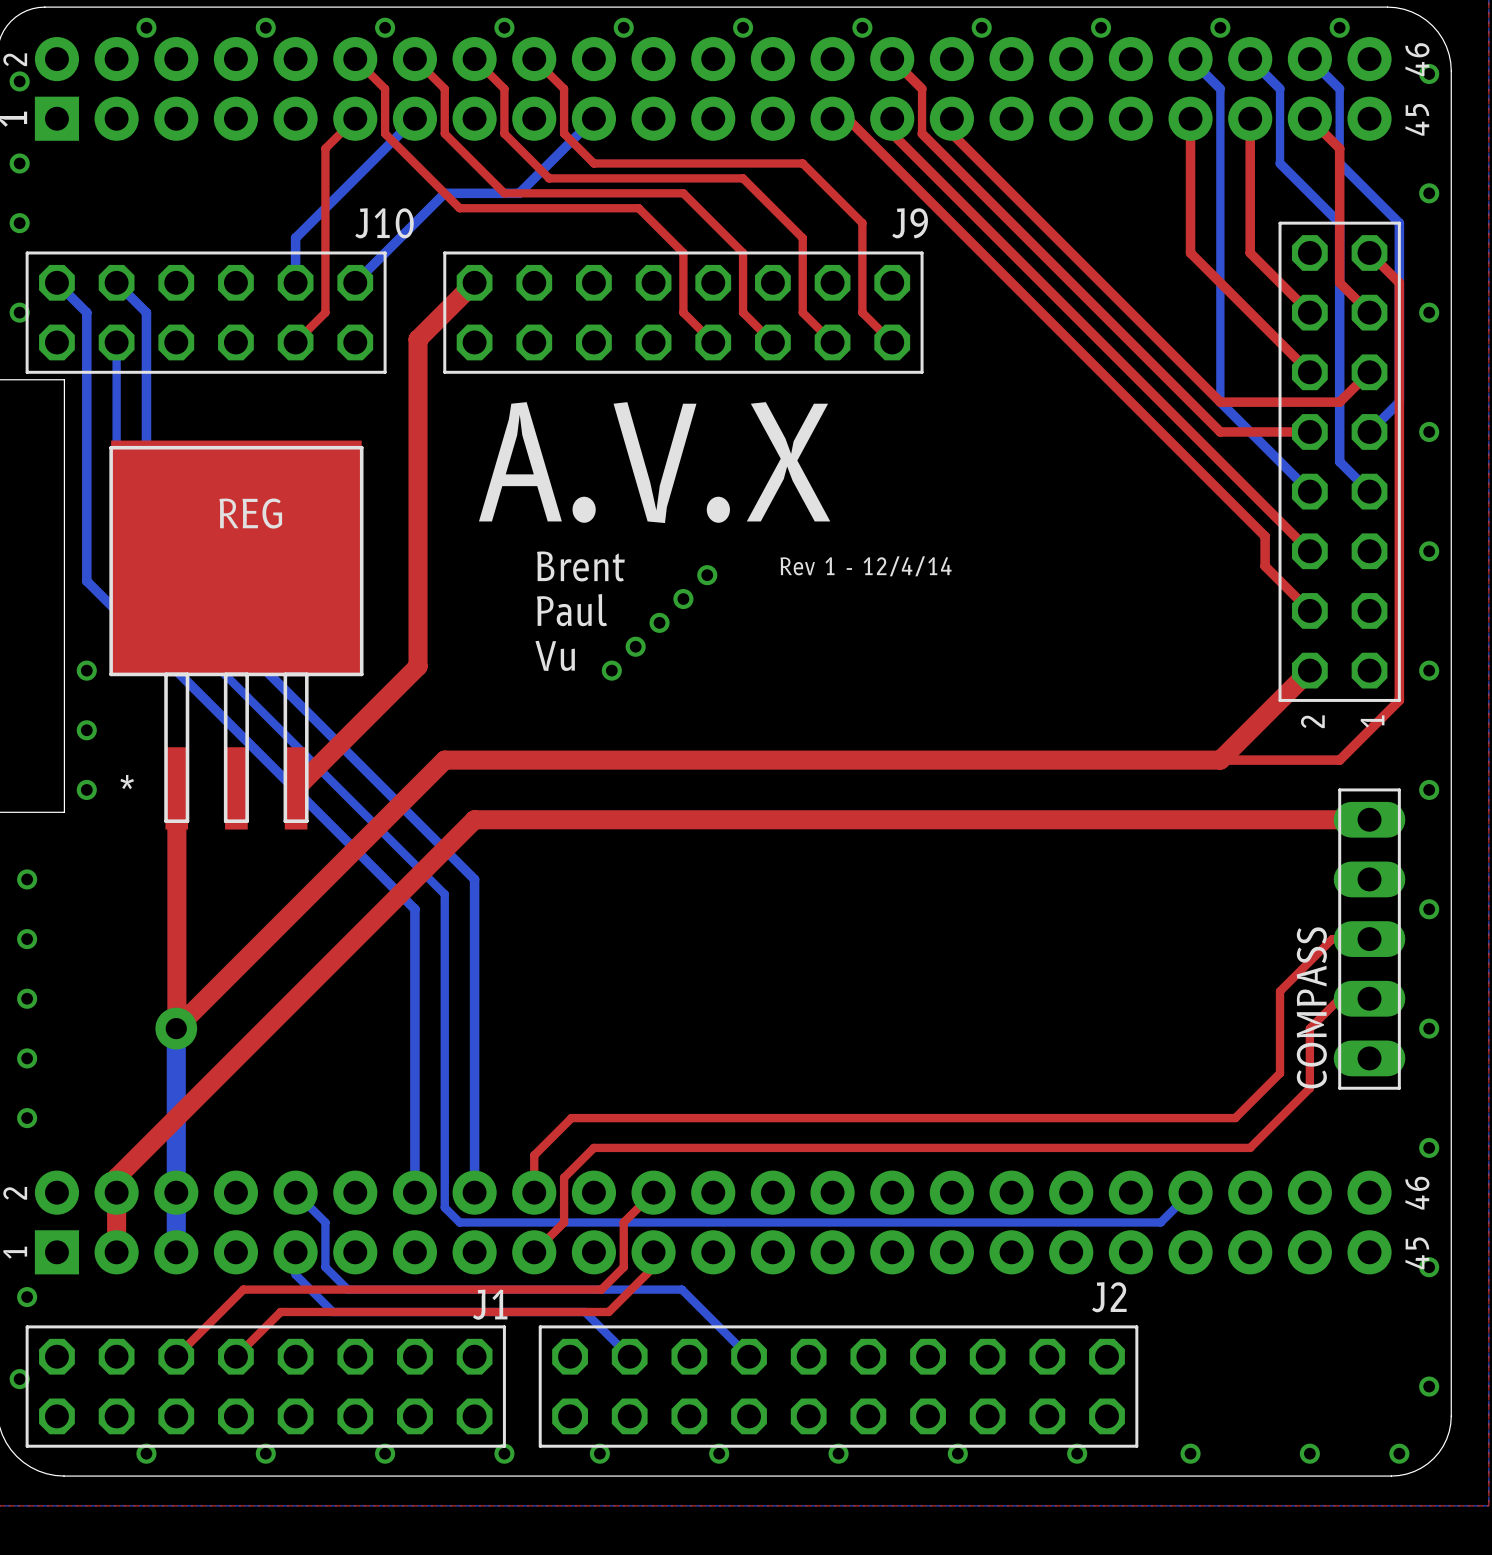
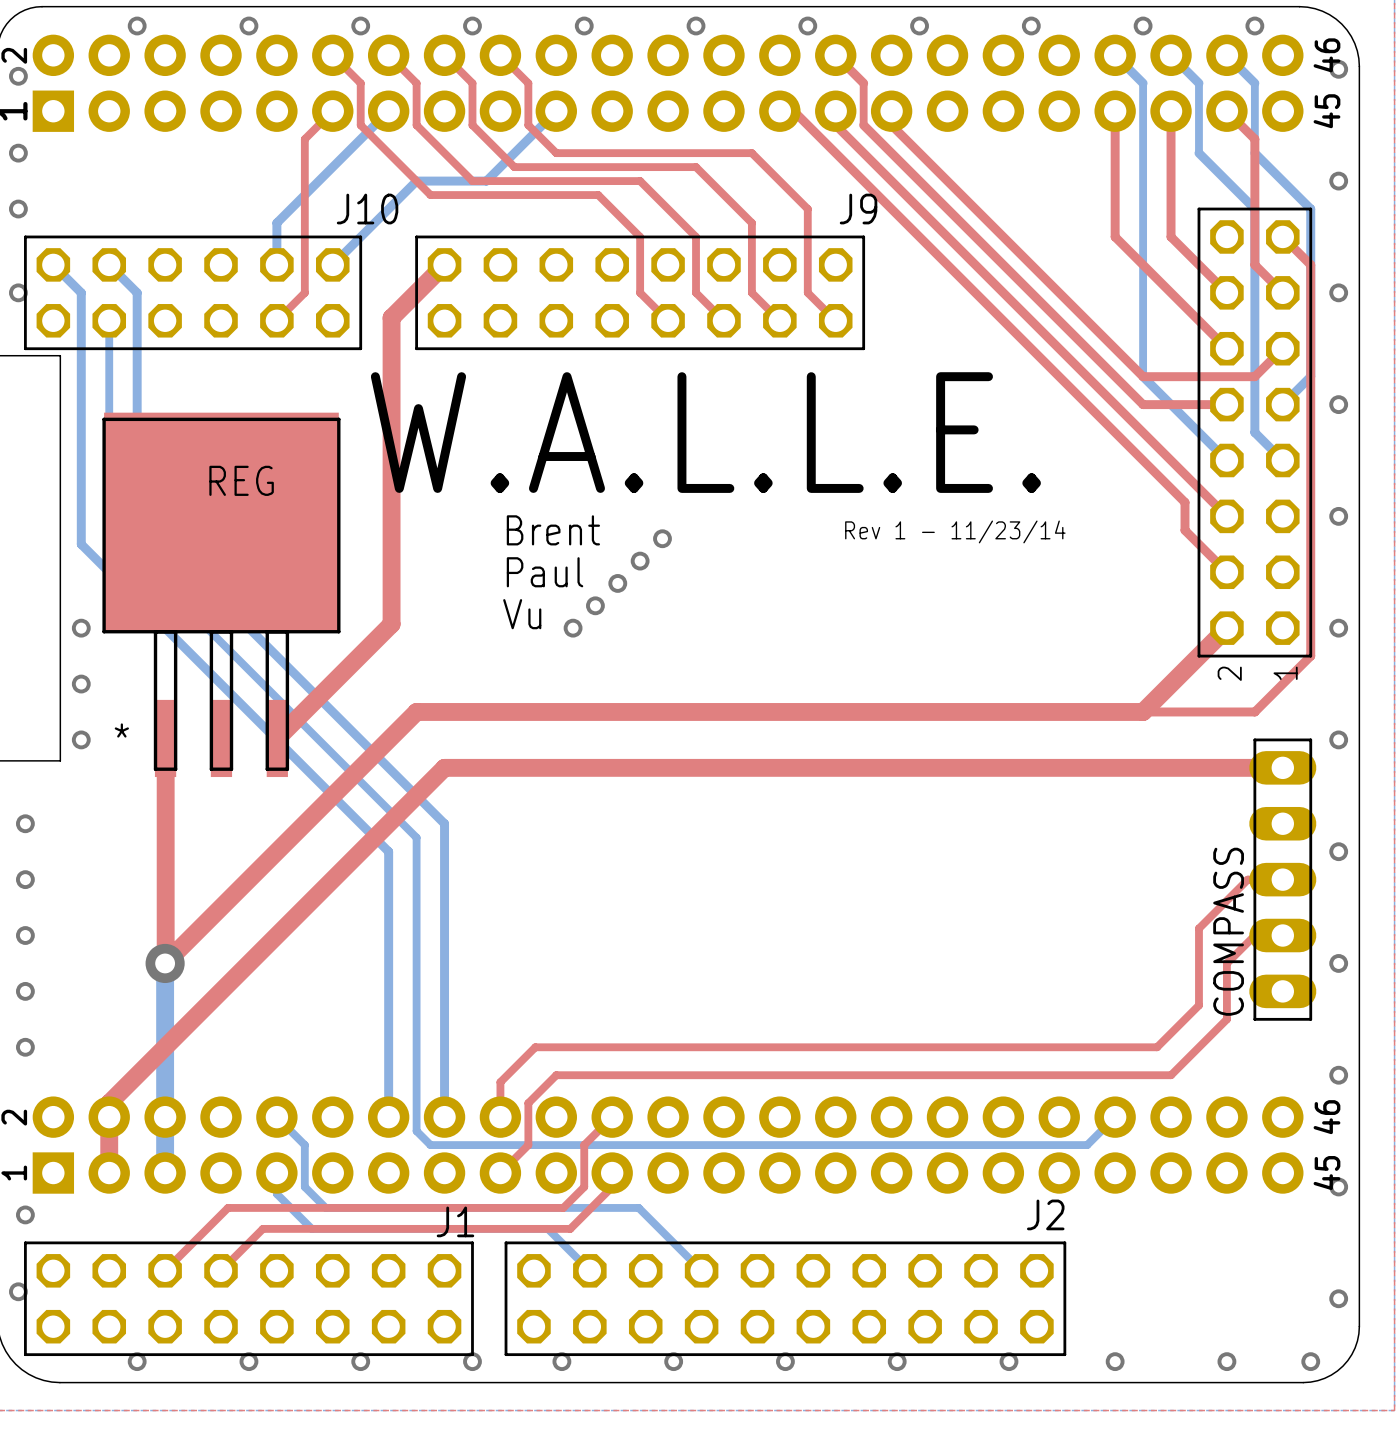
text: A.V.X (654, 462) -> none
text: none -> W.A.L.L.E. (705, 432)
text: Rev 1 - 12/4/14 (866, 566) -> Rev 1 - 11/23/14 (955, 531)

